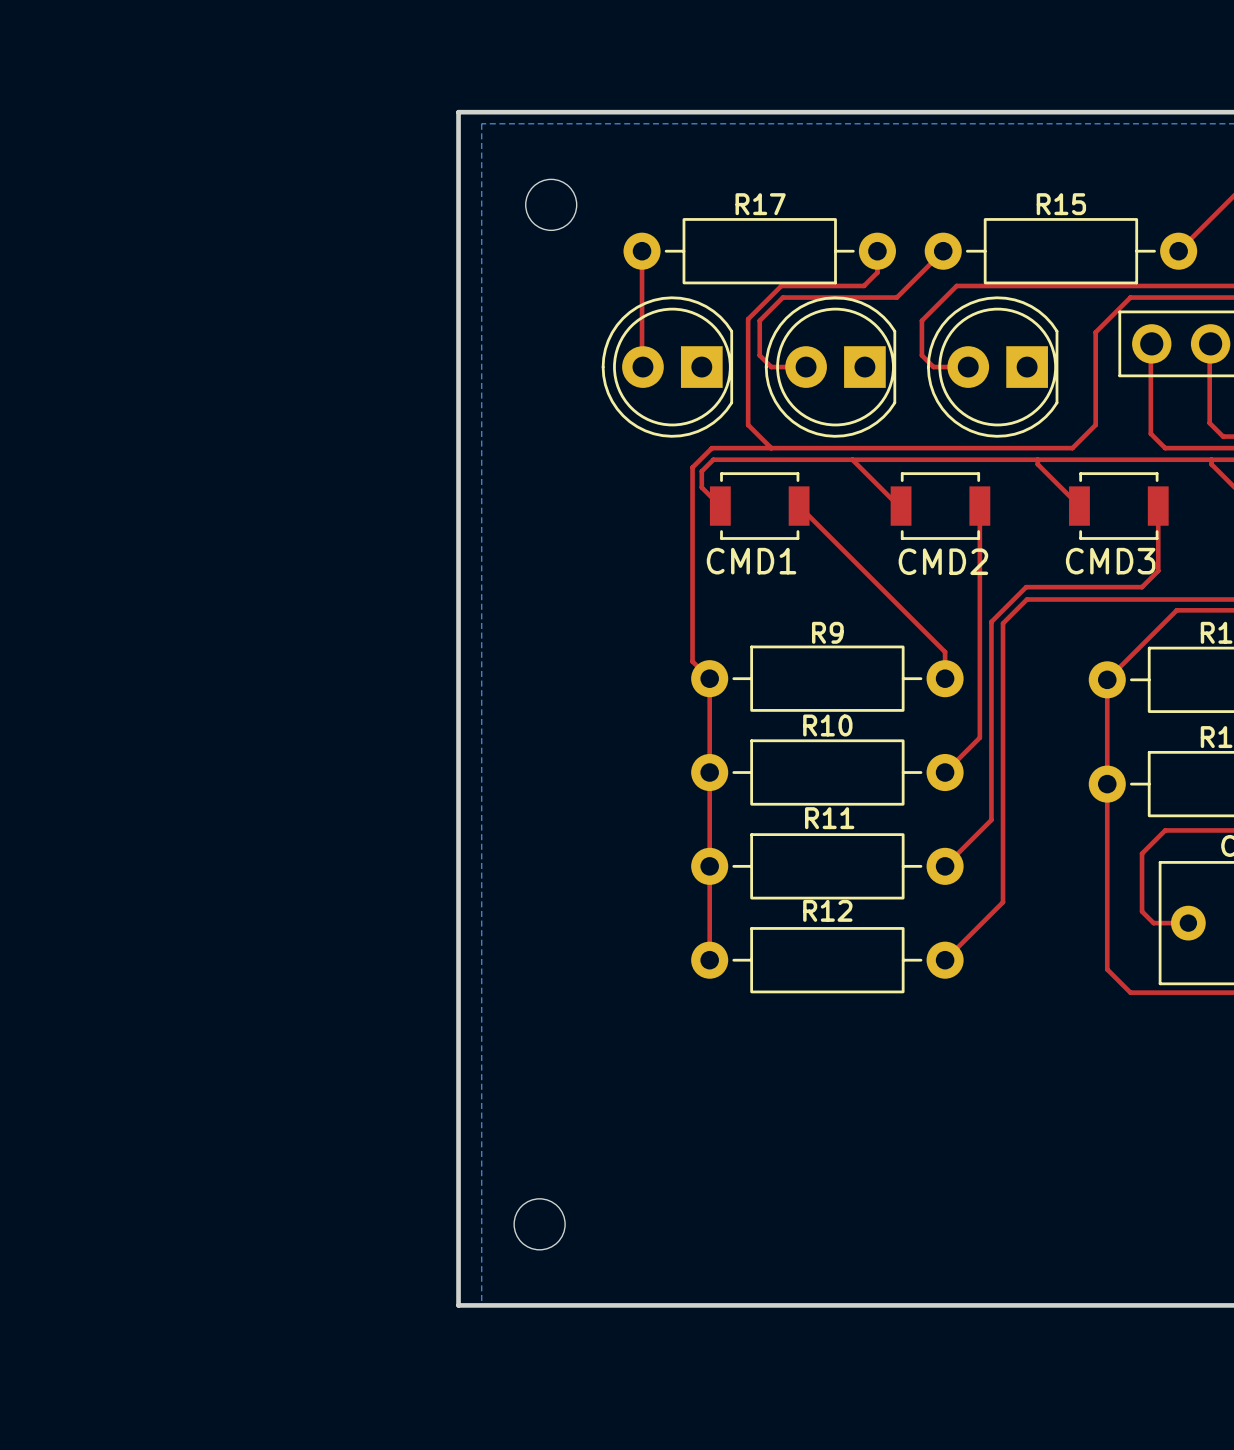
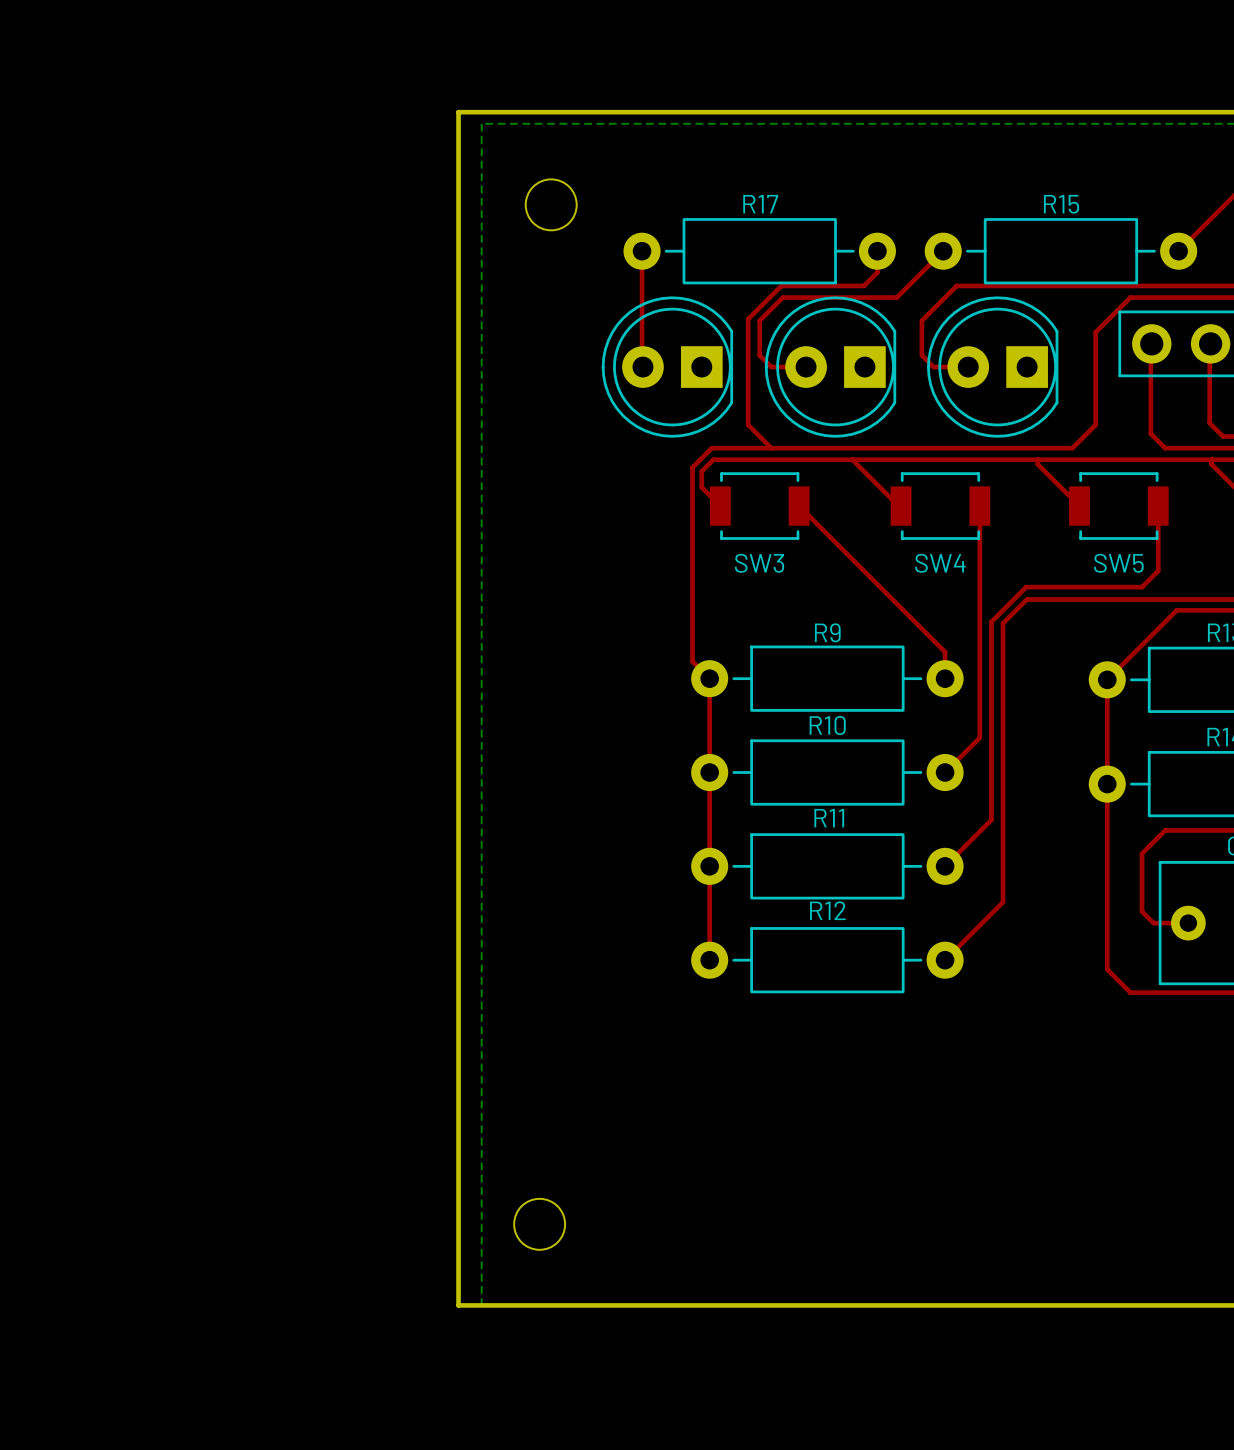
text: CMD1 (751, 561) -> none
text: CMD2 (943, 561) -> none
text: CMD3 (1110, 561) -> none
SW4 name: none -> SW4 (940, 563)
SW3 name: none -> SW3 (759, 563)
SW5 name: none -> SW5 (1118, 563)

